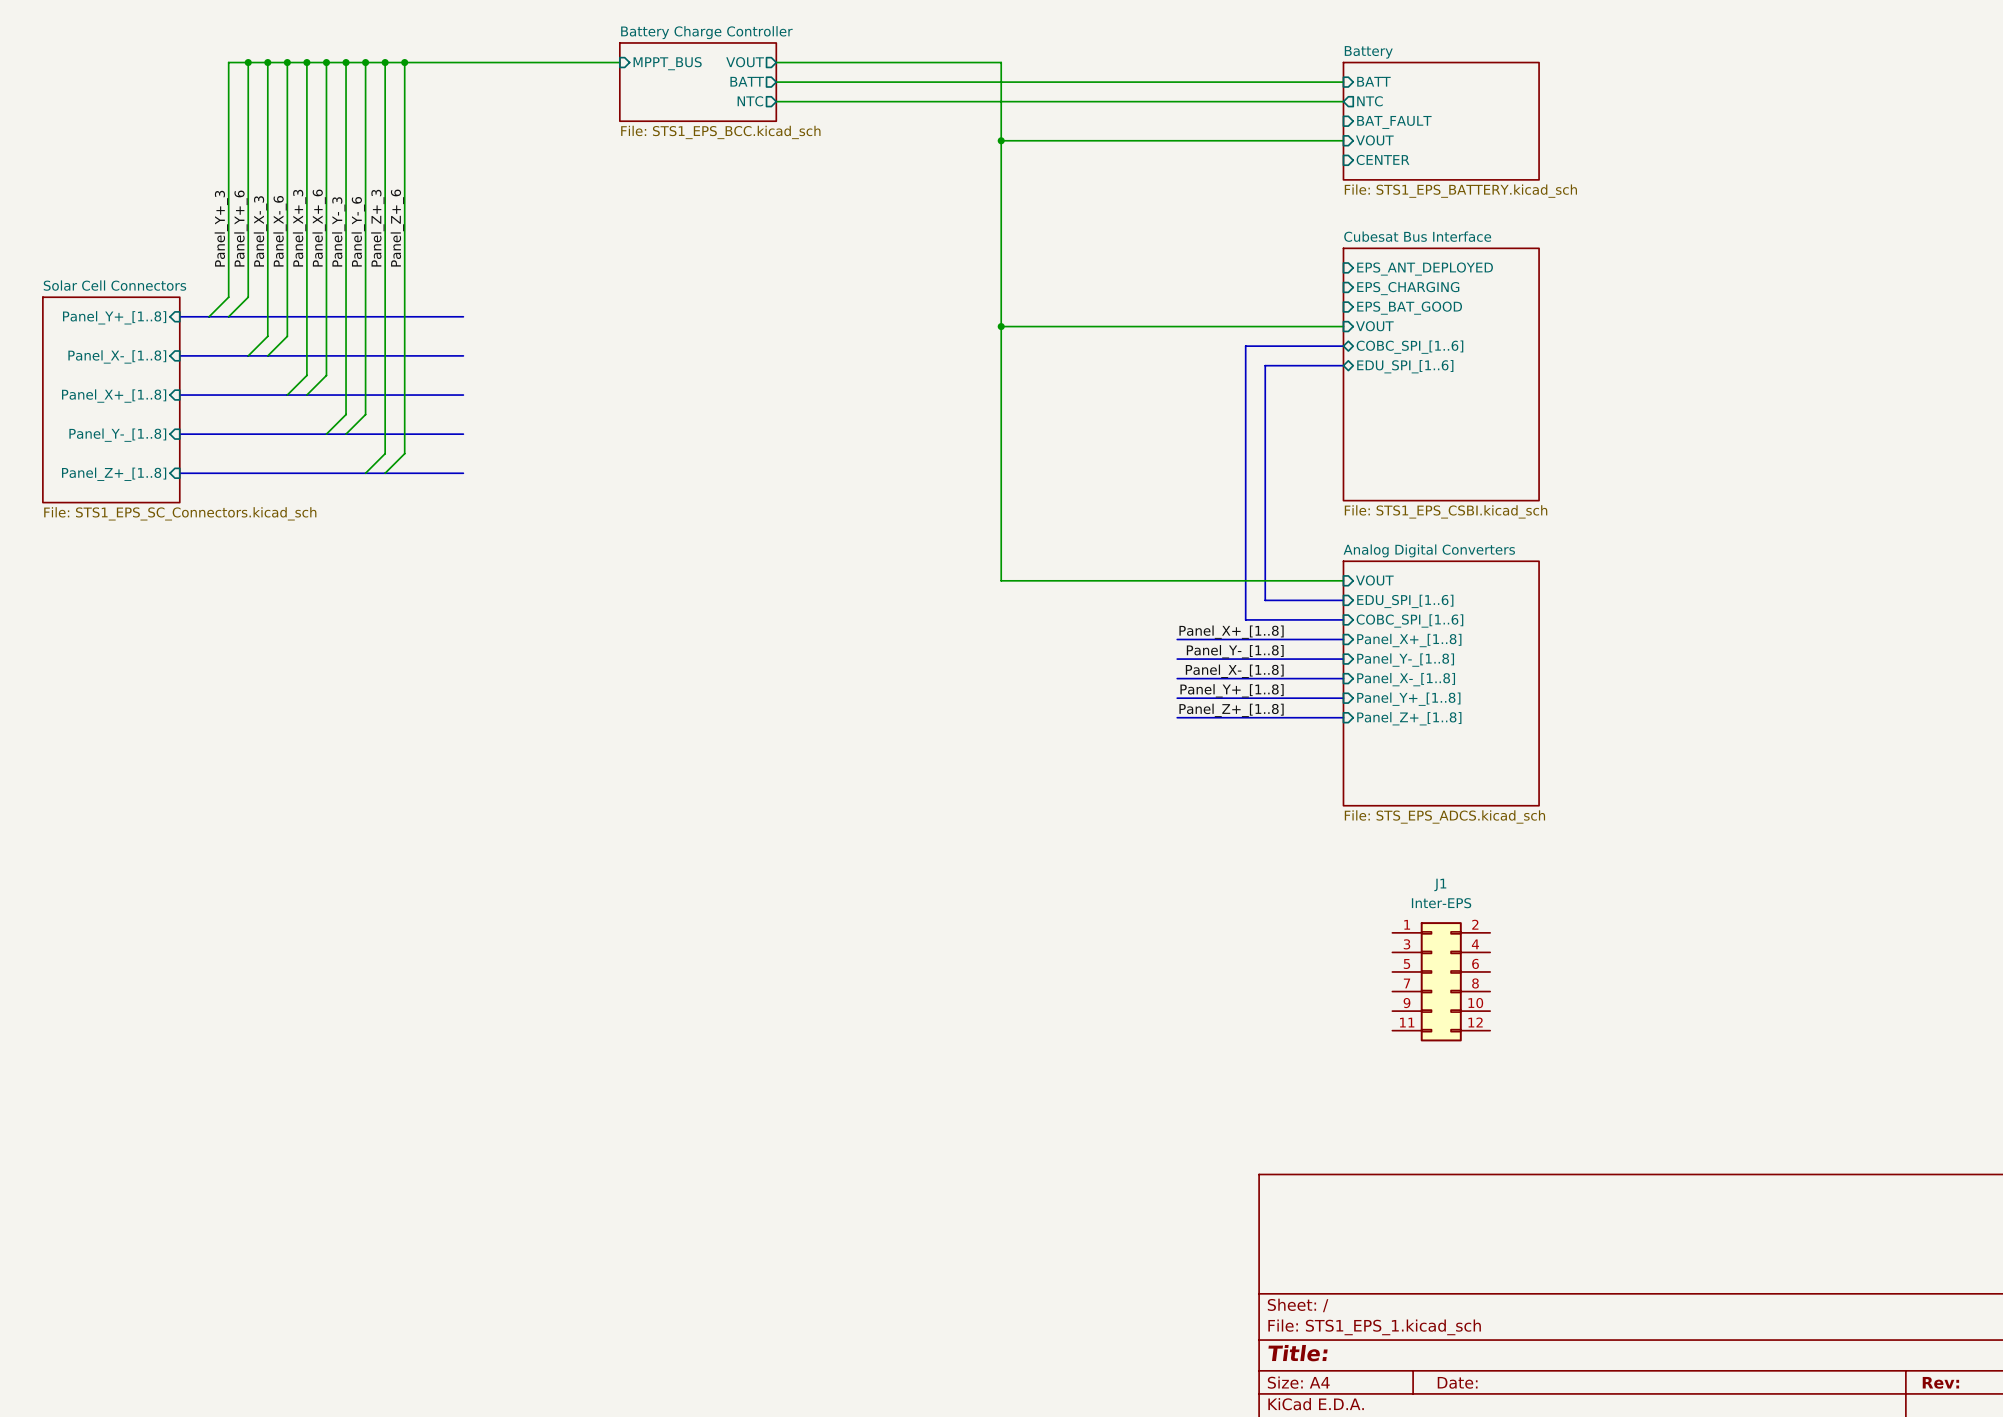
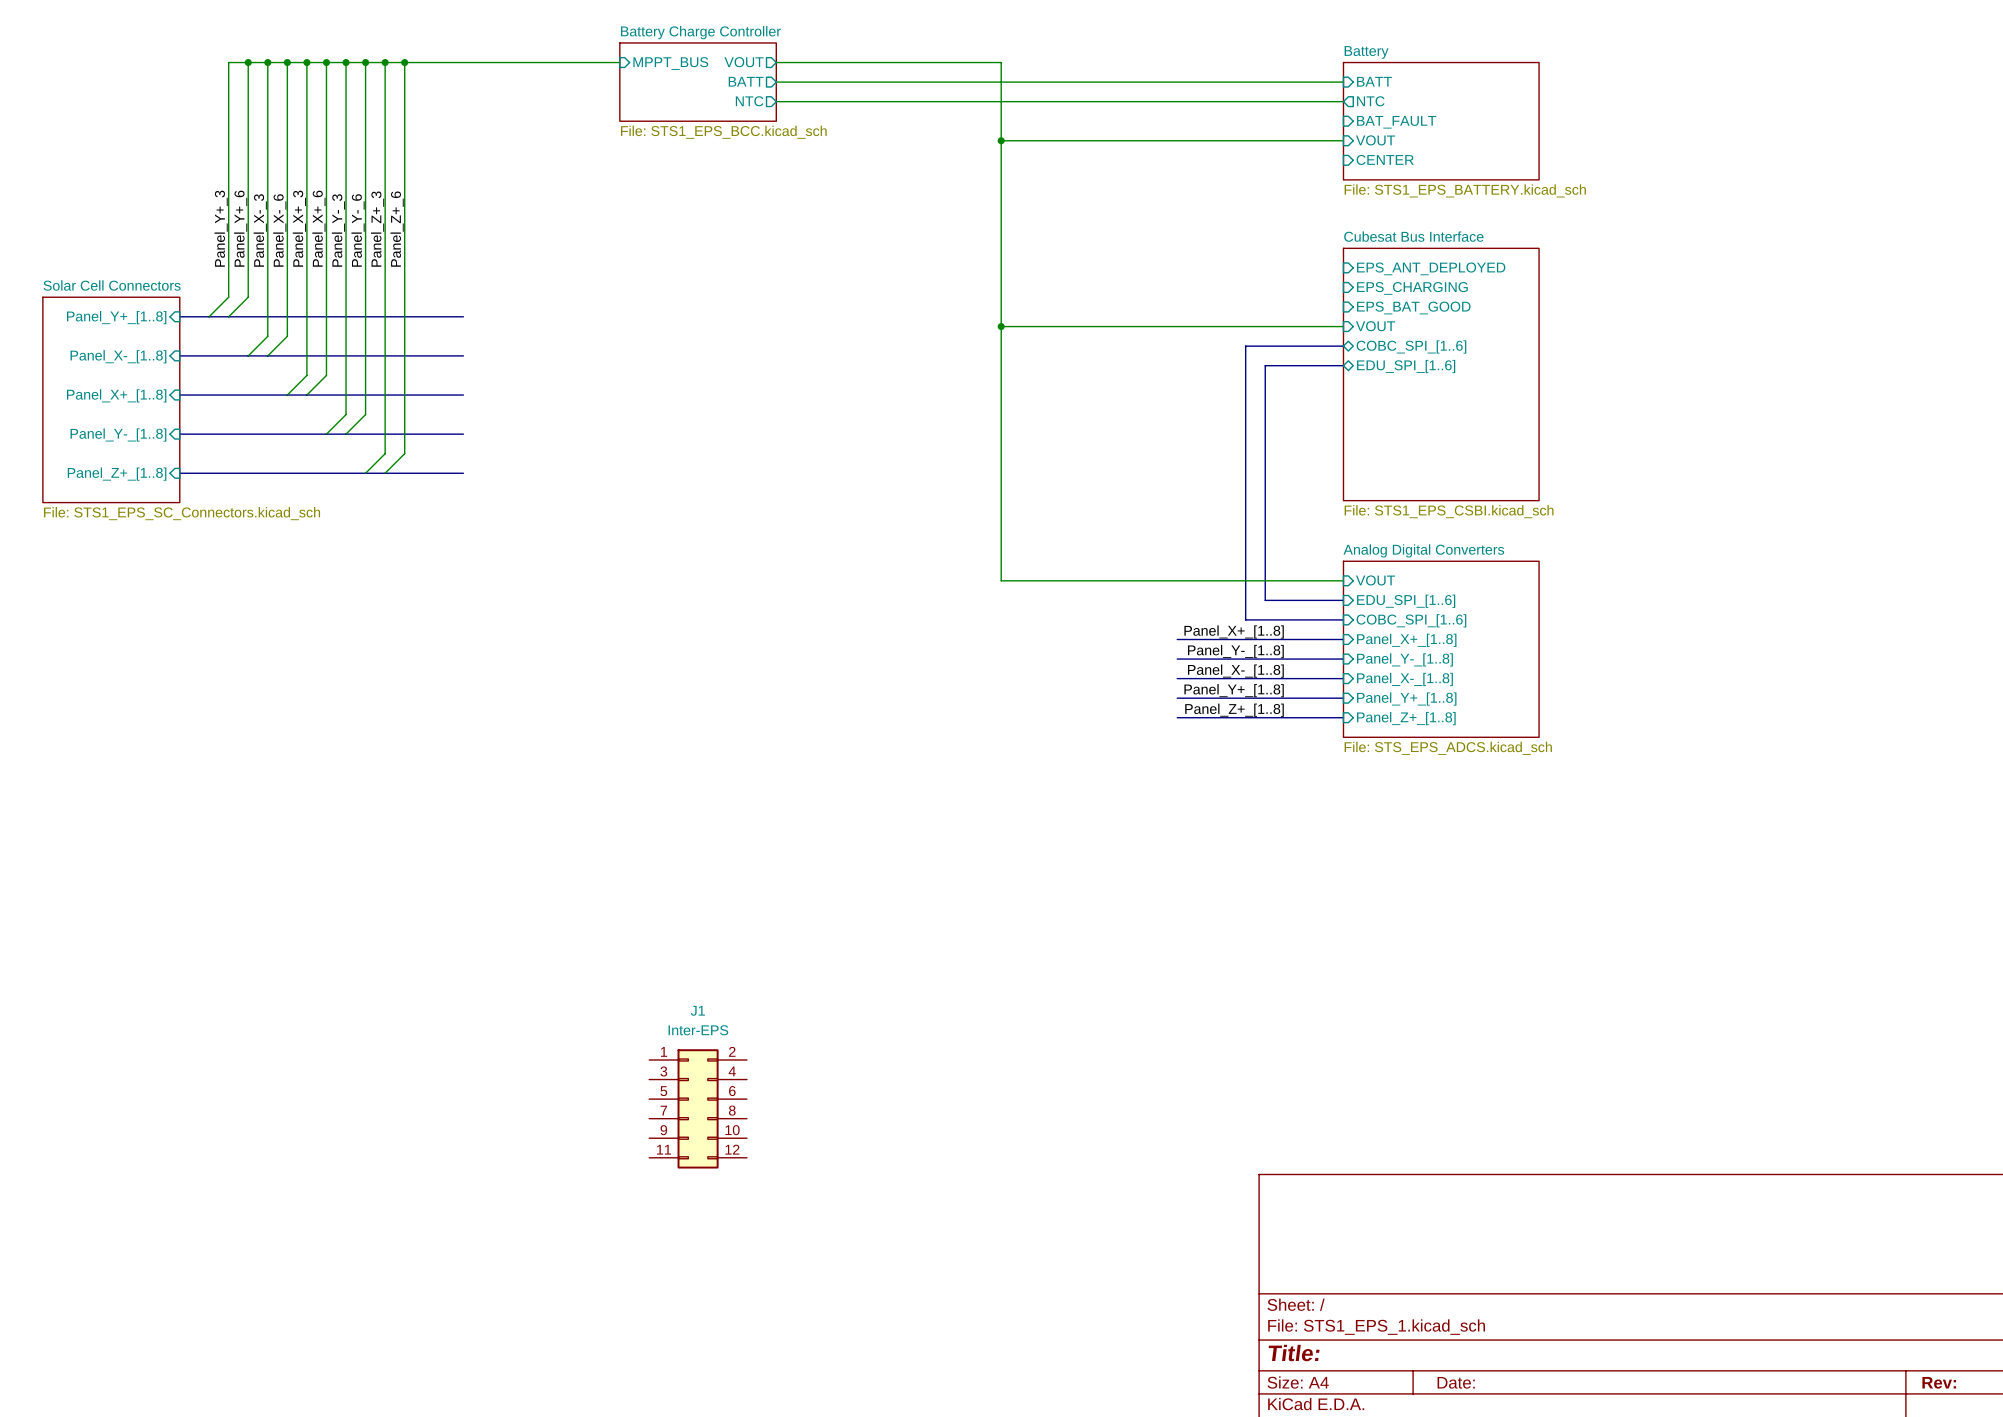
sheet Analog Digital Converters: none -> File: STS_EPS_ADCS.kicad_sch (1441, 649)
sheet Analog Digital Converters: File: STS_EPS_ADCS.kicad_sch (1441, 683) -> none
J1 position: (1441, 981) -> (698, 1108)

